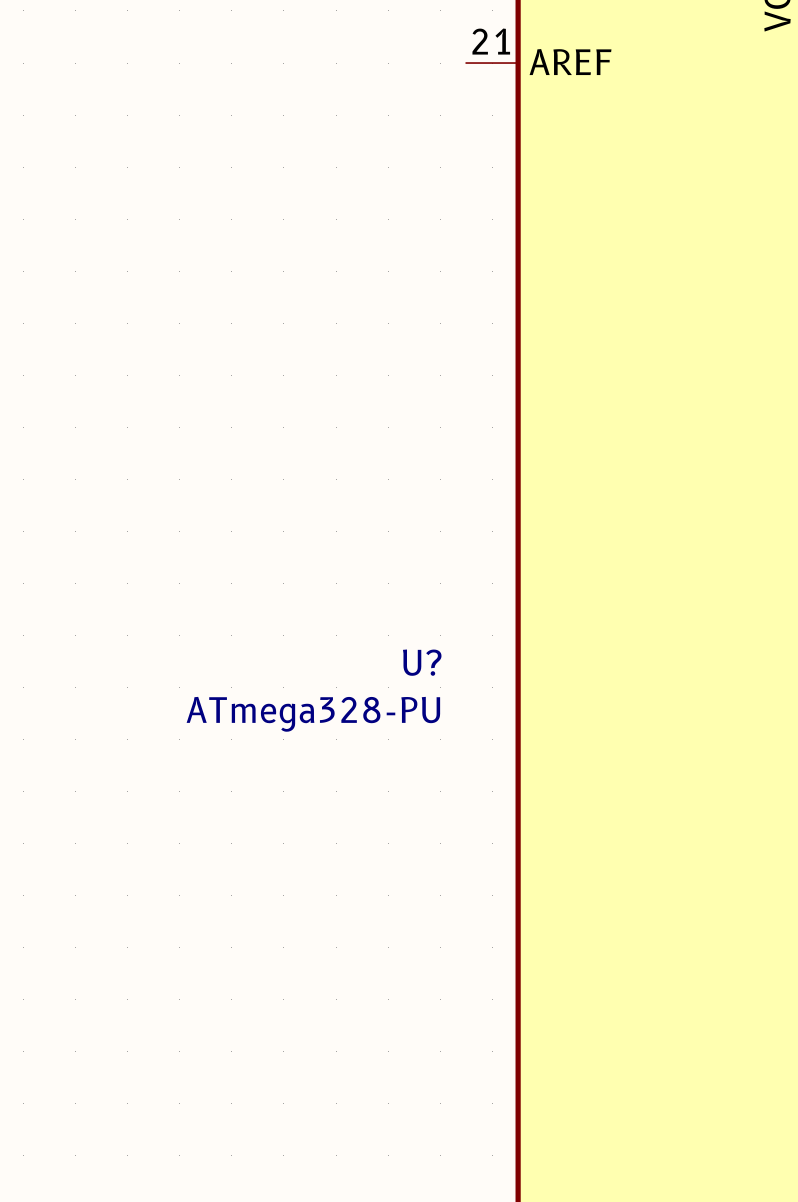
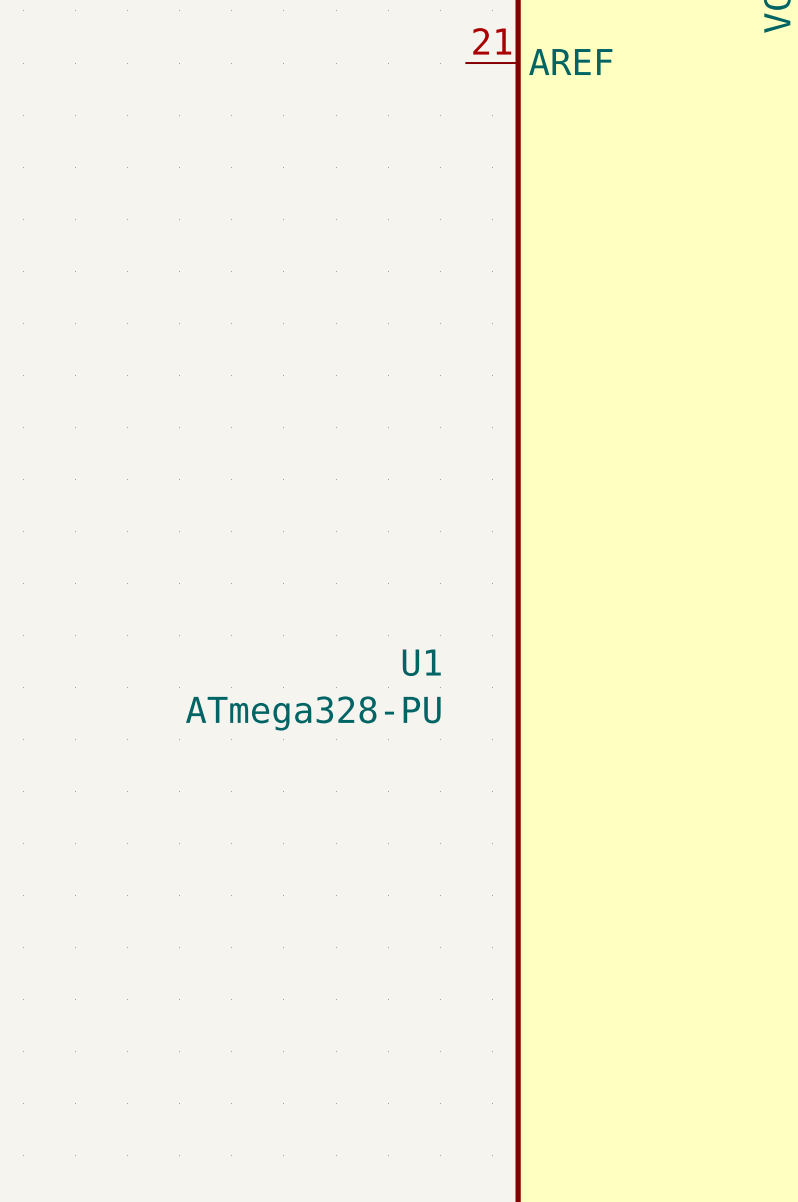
U? name: U? (422, 662) -> U1 (421, 662)

